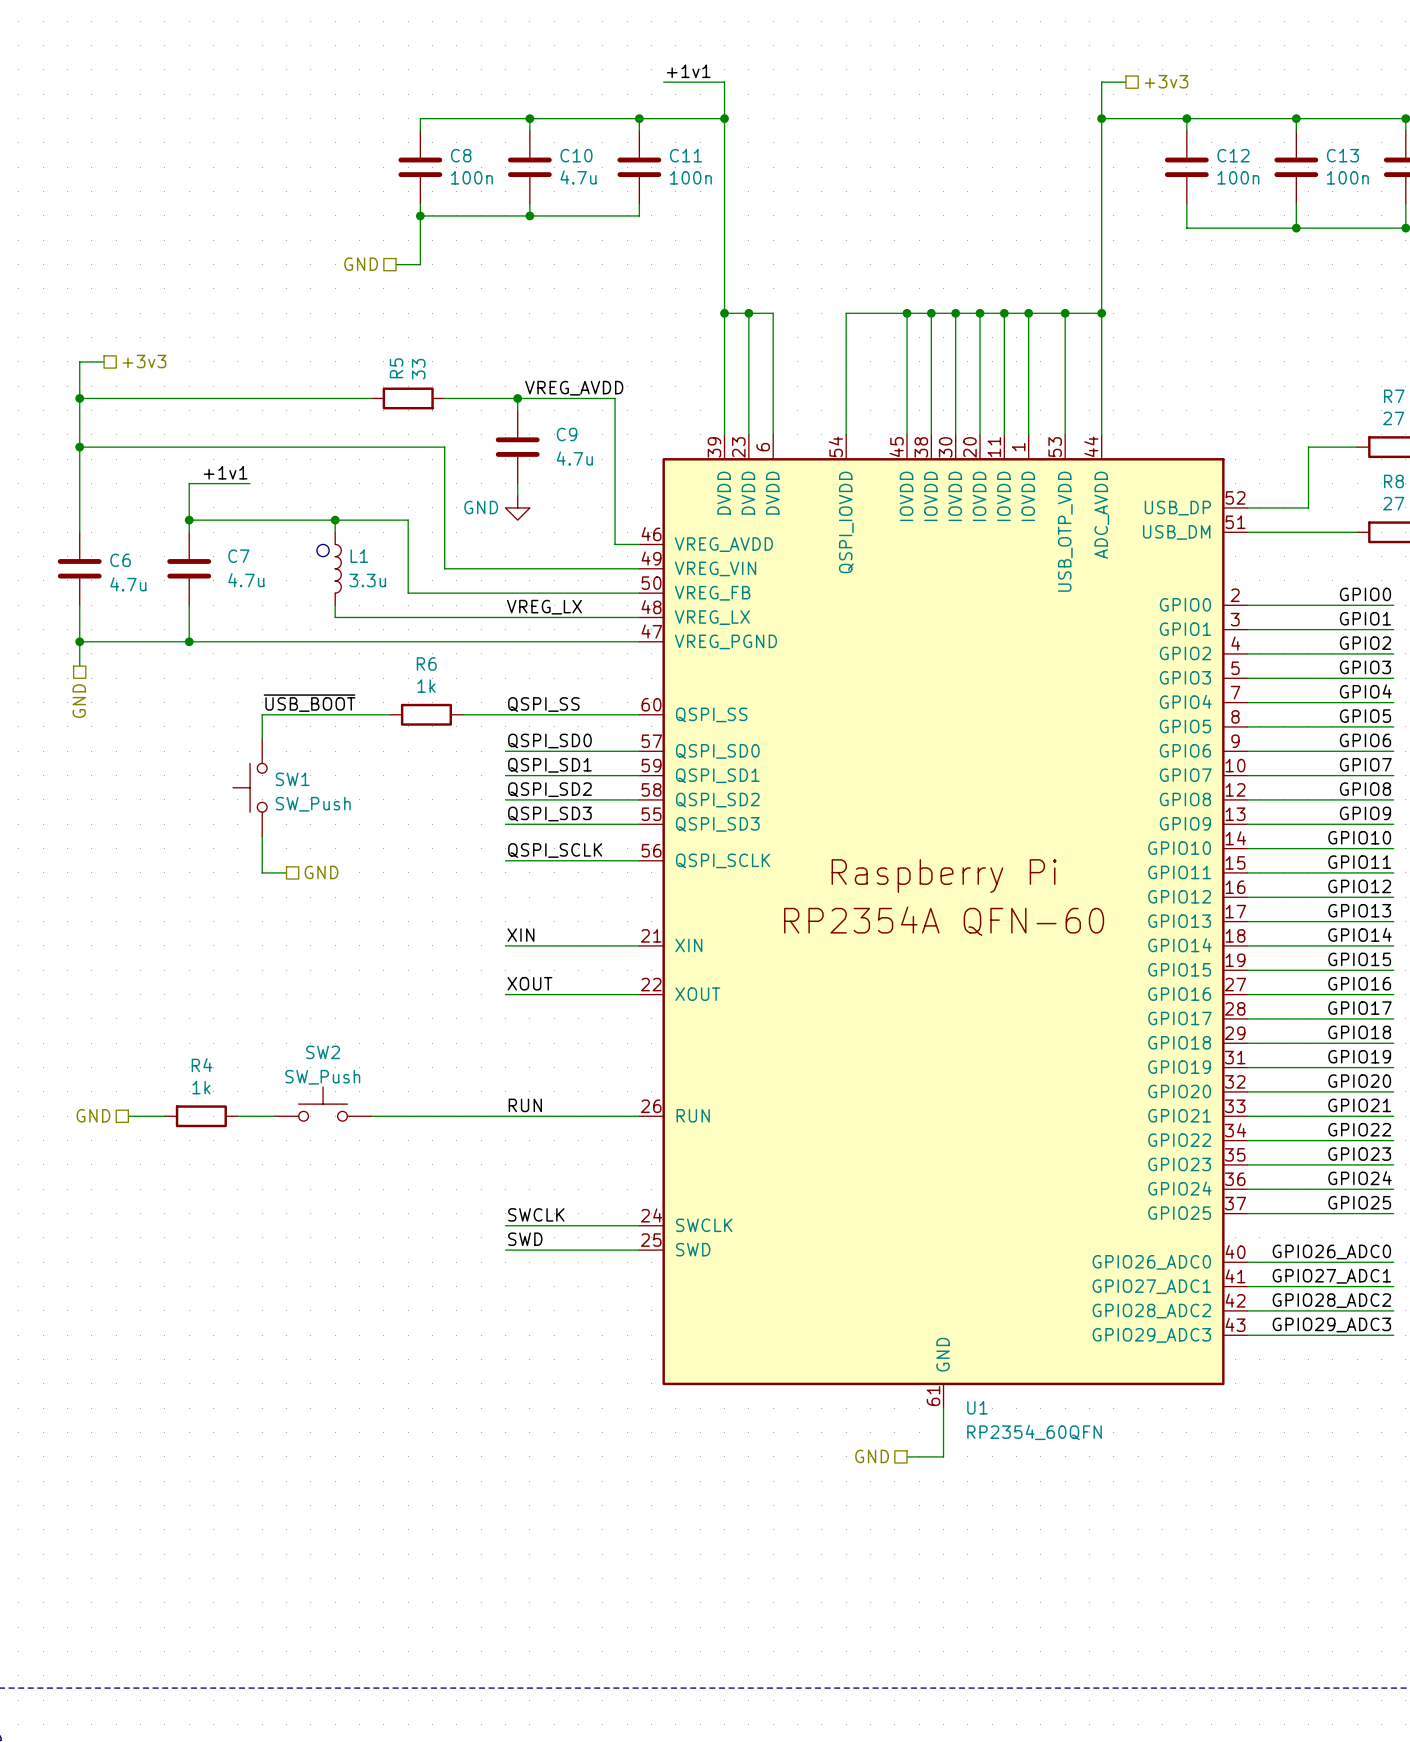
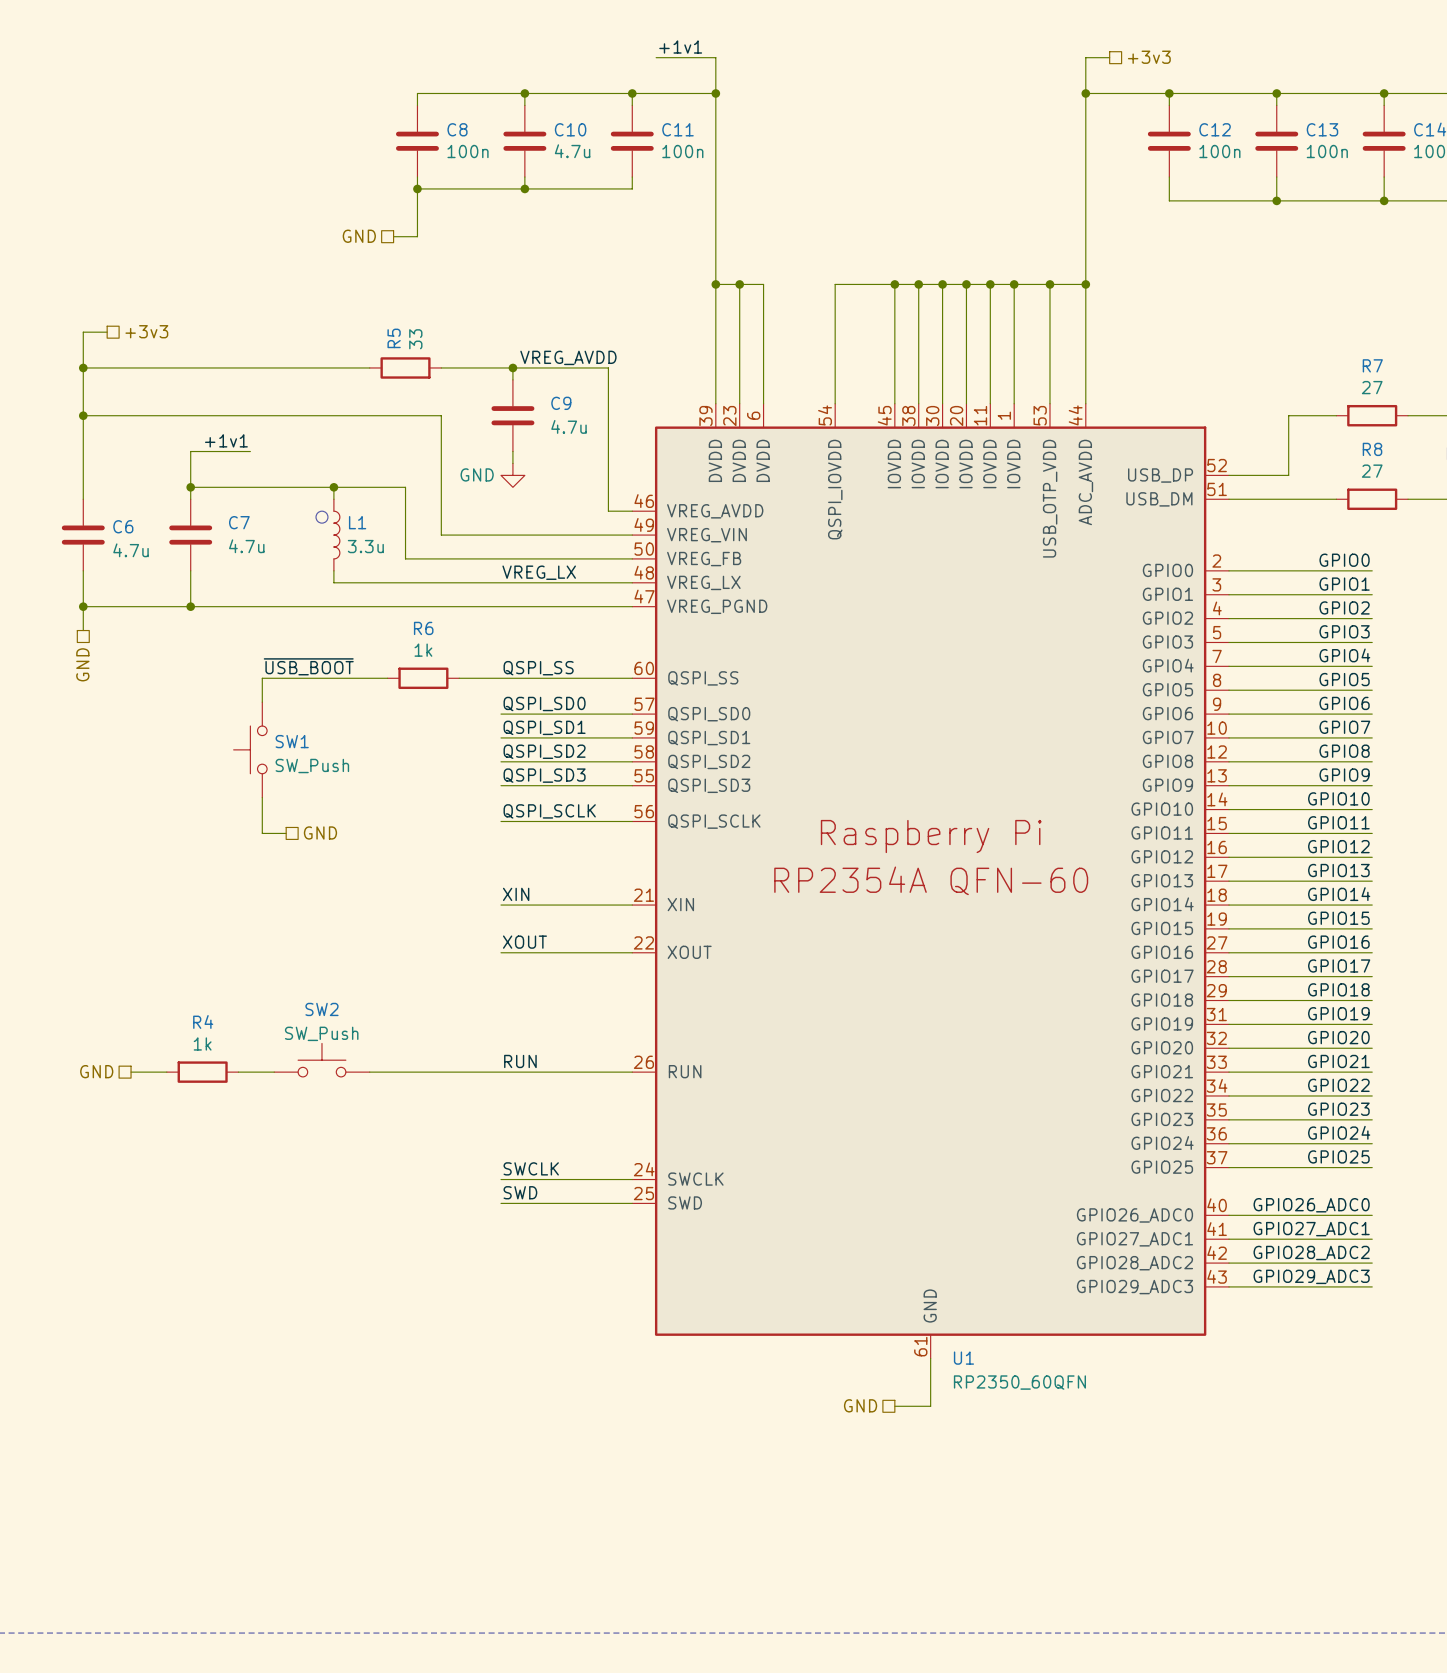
U1 value: RP2354_60QFN (1034, 1432) -> RP2350_60QFN (1019, 1382)

